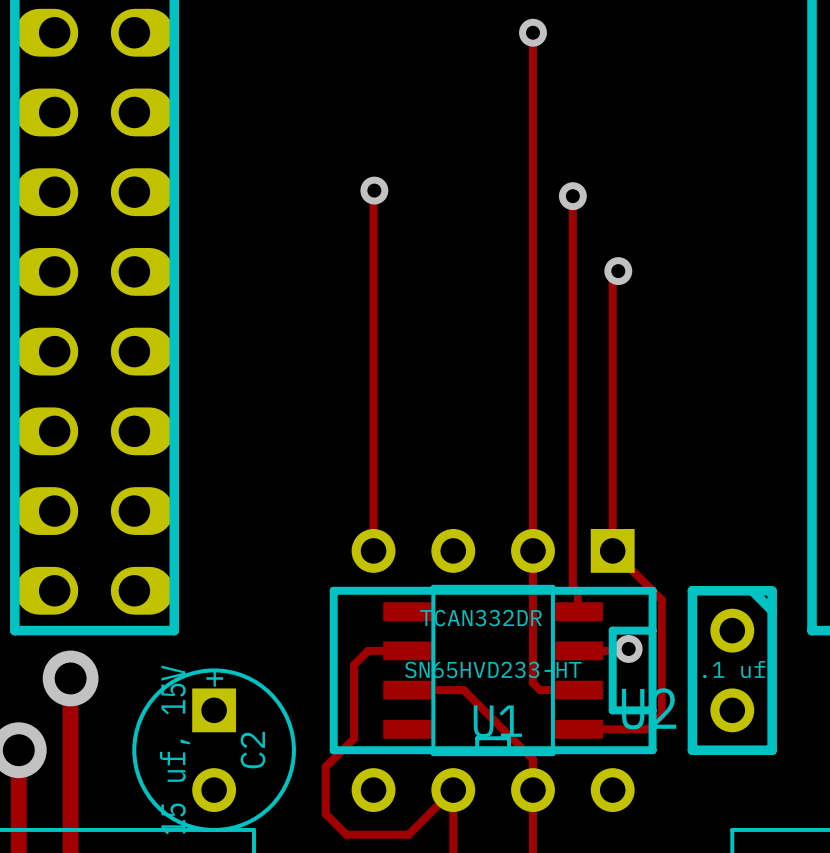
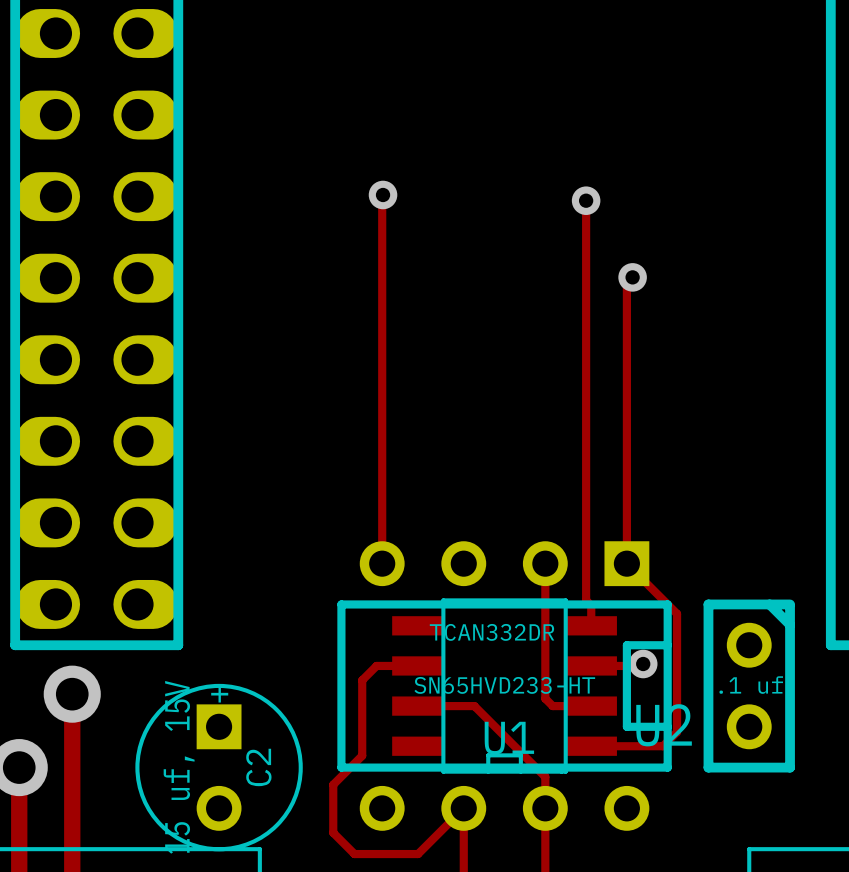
track: (532, 32) (532, 550) -> none
via: (532, 32) -> none

